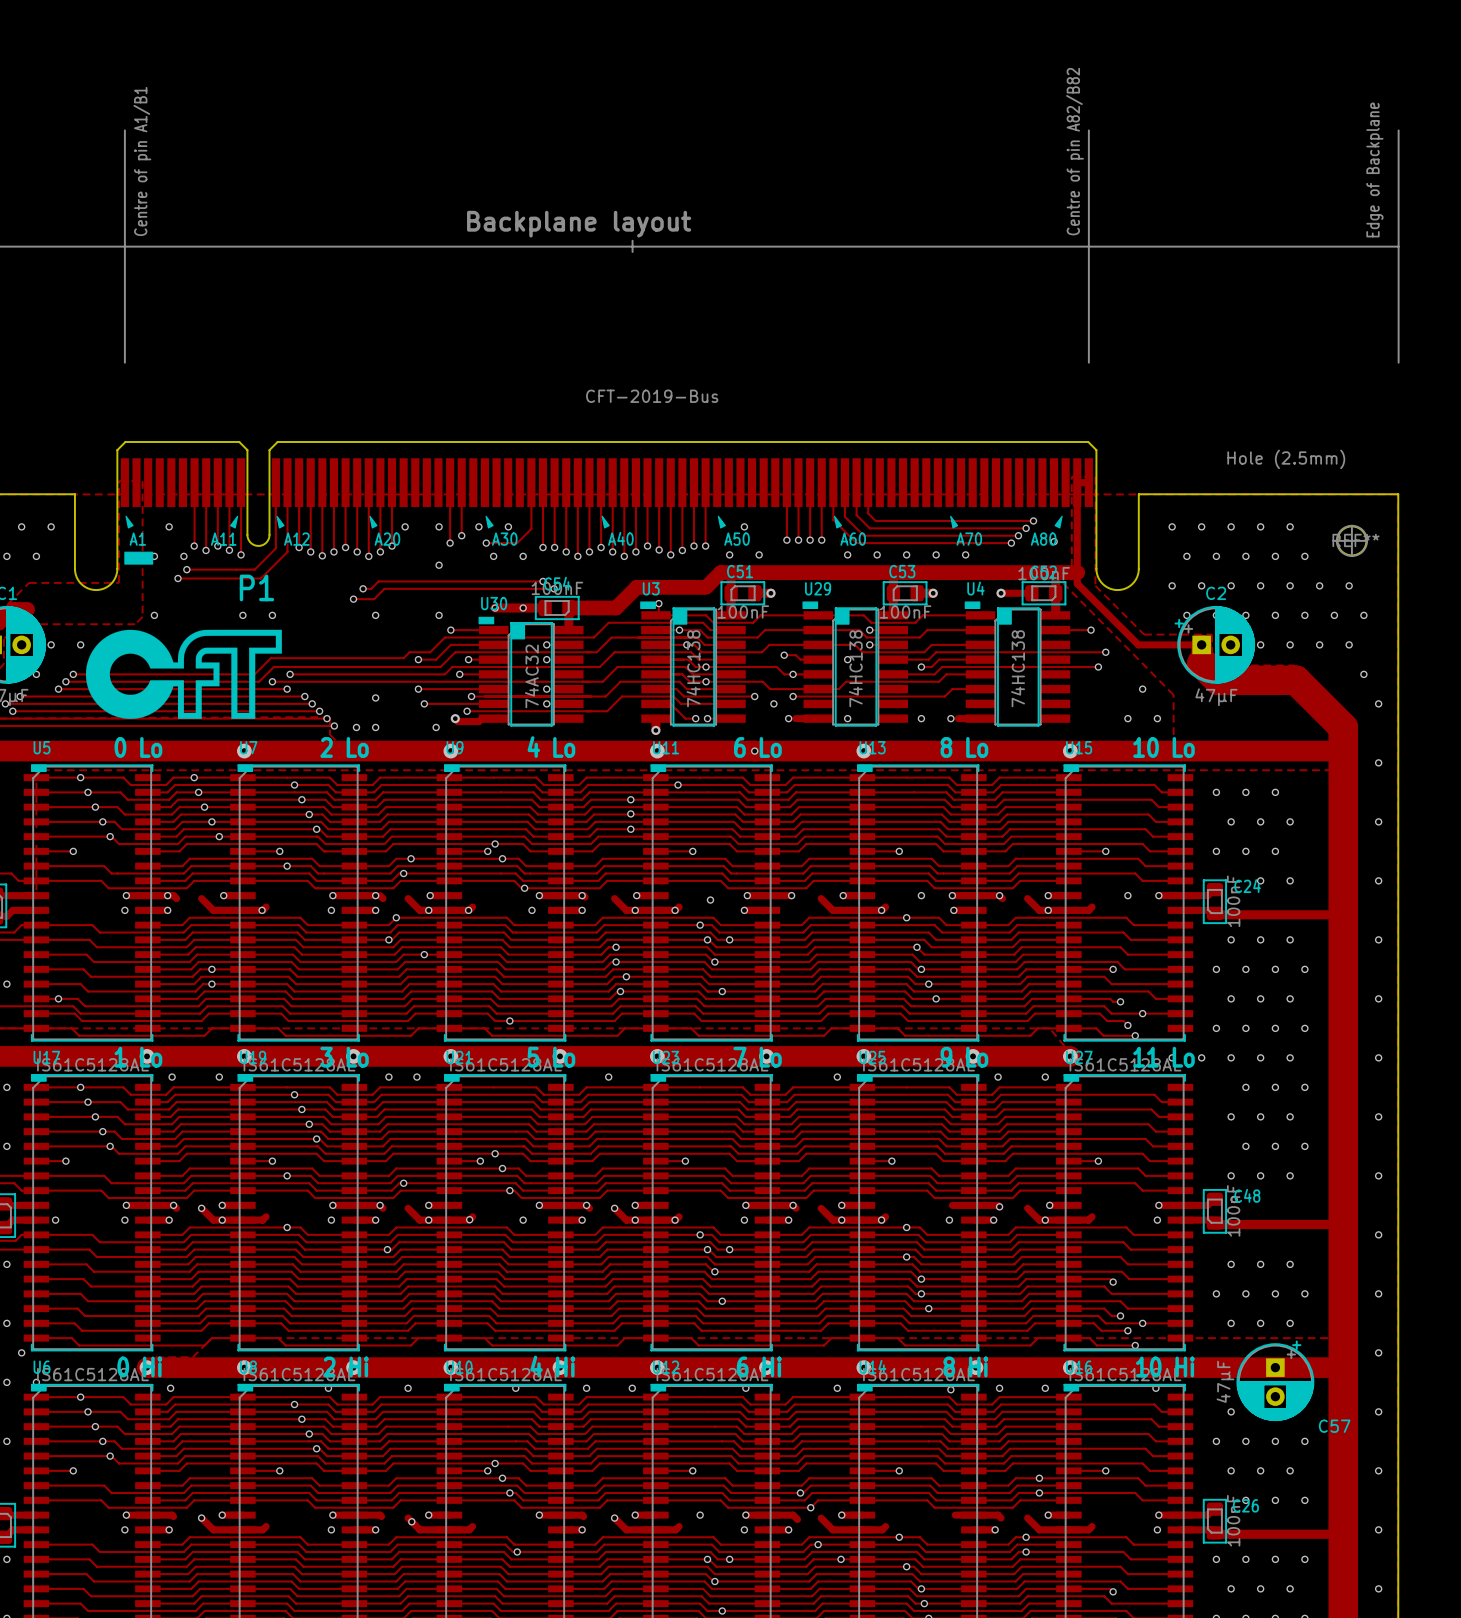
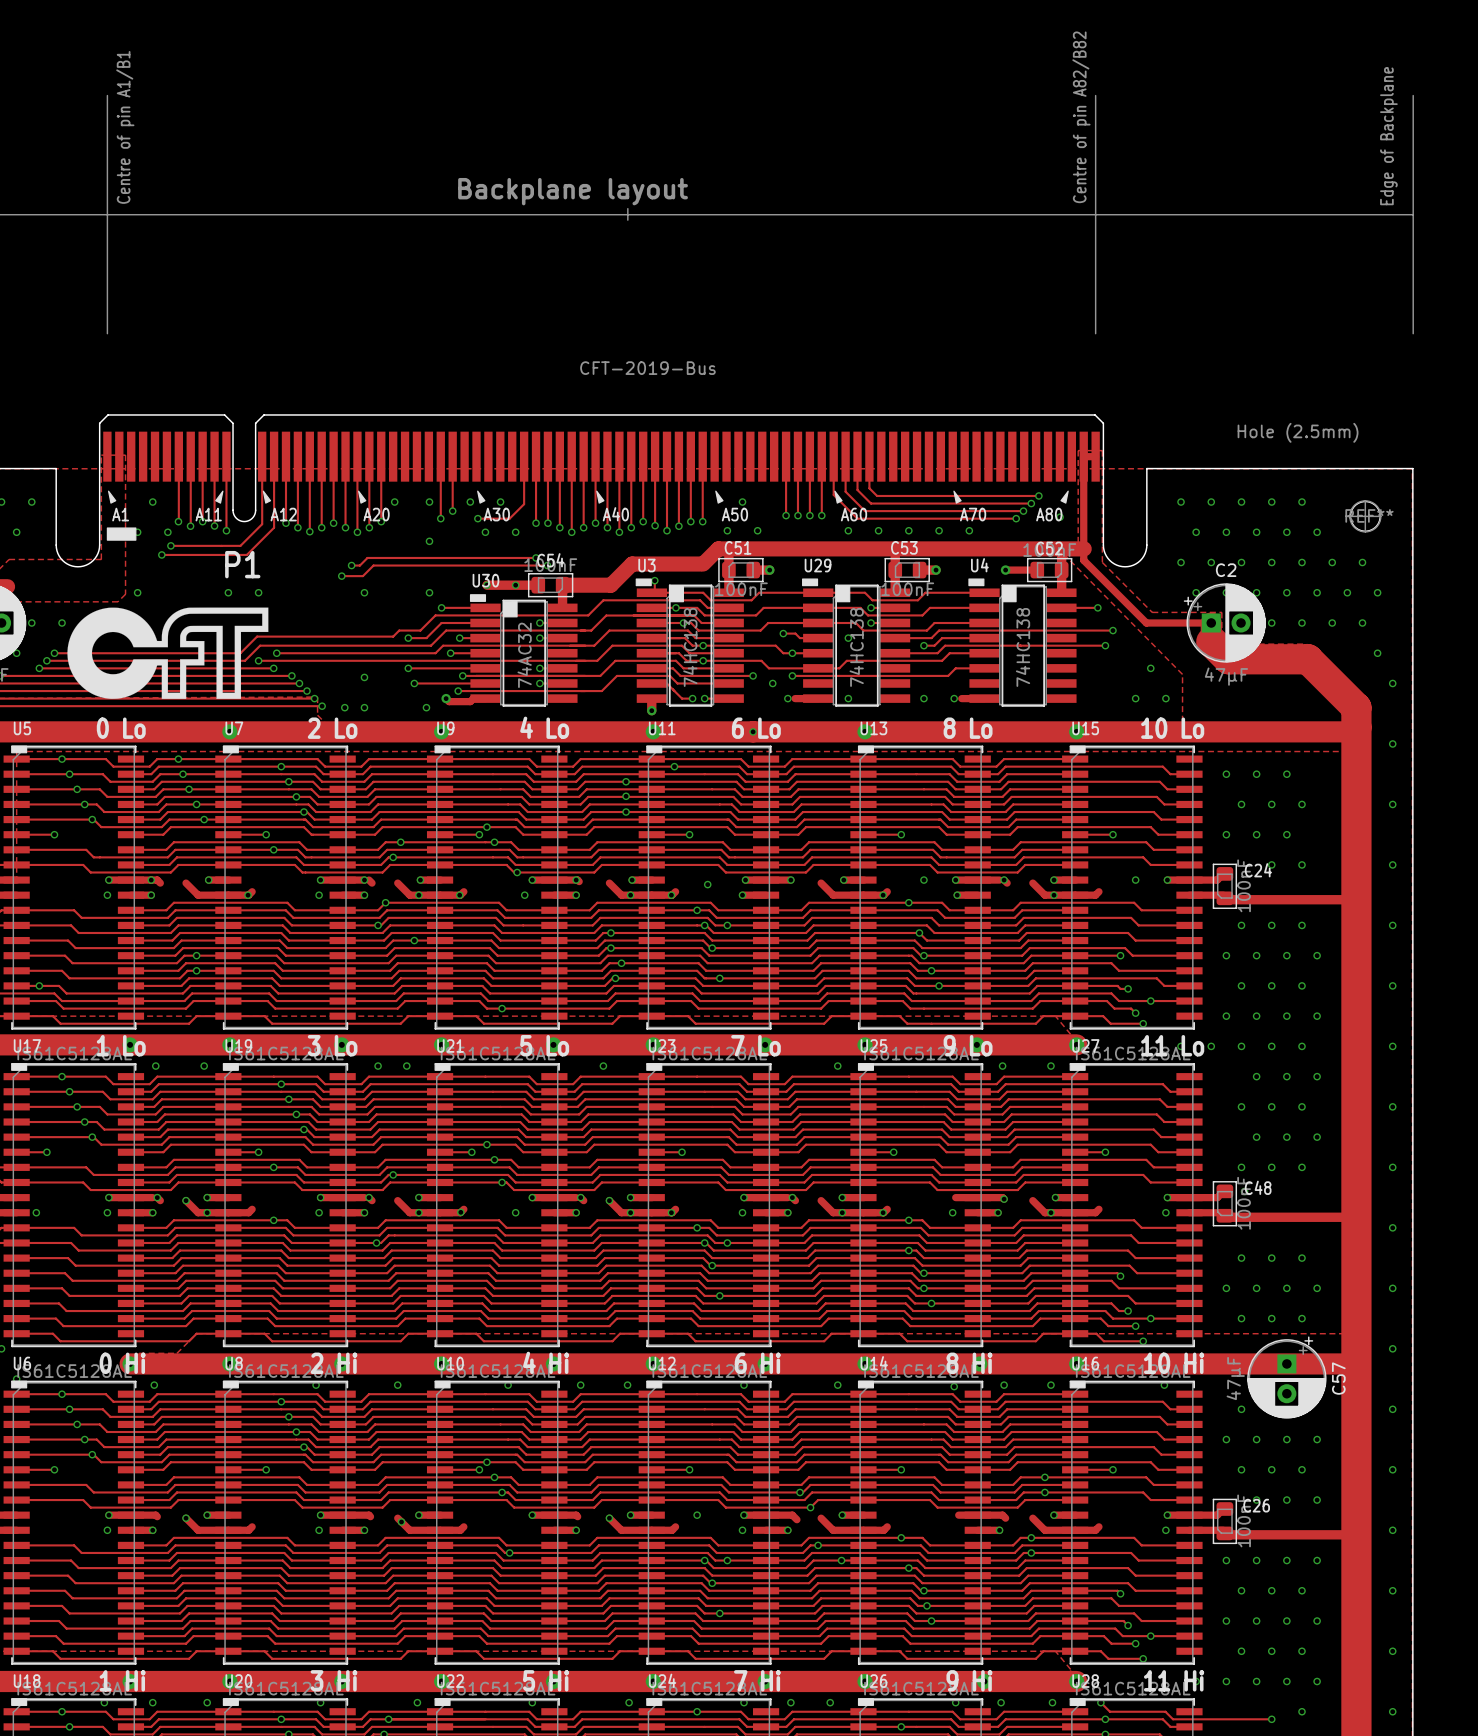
C57 name rotation: 0° (1334, 1426) -> 90° counterclockwise (1338, 1378)
C57 name position: C57 (1334, 1426) -> C57 (1338, 1378)

